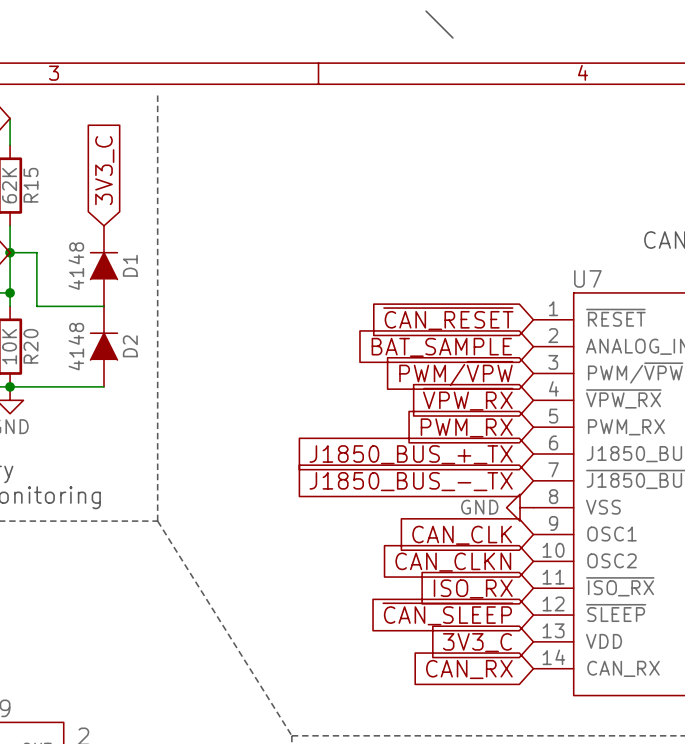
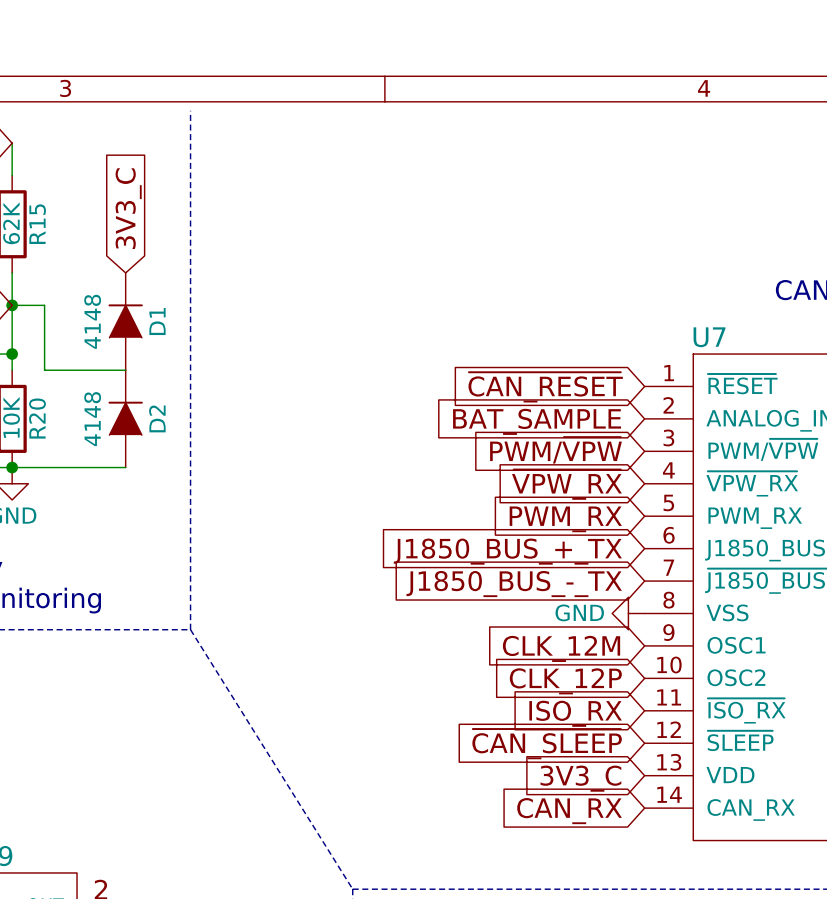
bus: (426, 11) (452, 37) -> none
global label: CAN_CLK (462, 535) -> CLK_12M (561, 648)
global label: CAN_CLKN (453, 562) -> CLK_12P (565, 681)

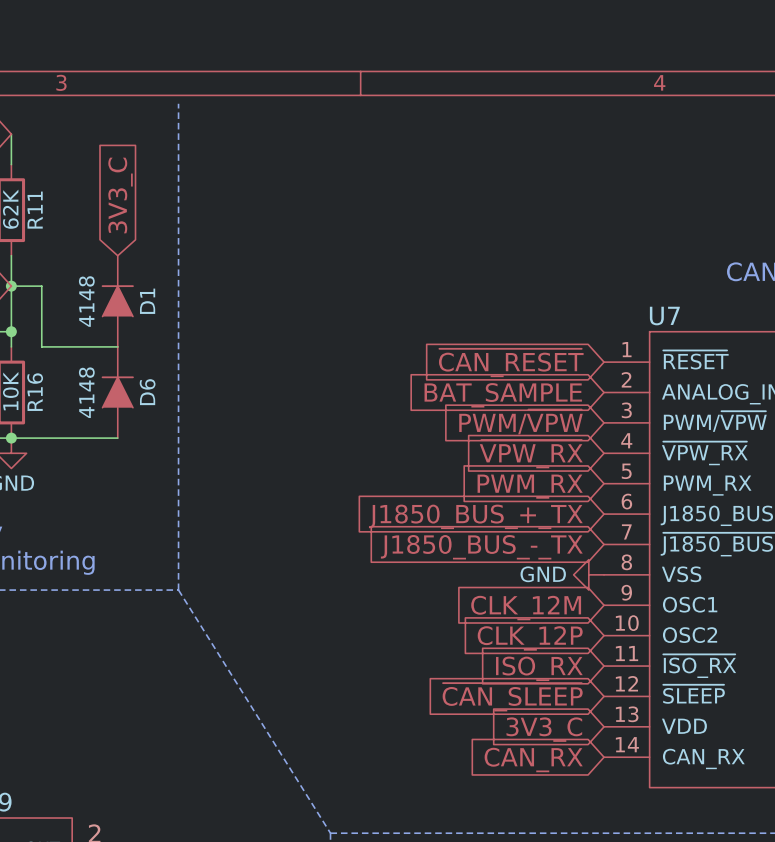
R15 name: R15 (37, 224) -> R11 (35, 210)
R20 name: R20 (37, 418) -> R16 (35, 392)
D2 name: D2 (157, 418) -> D6 (147, 392)

